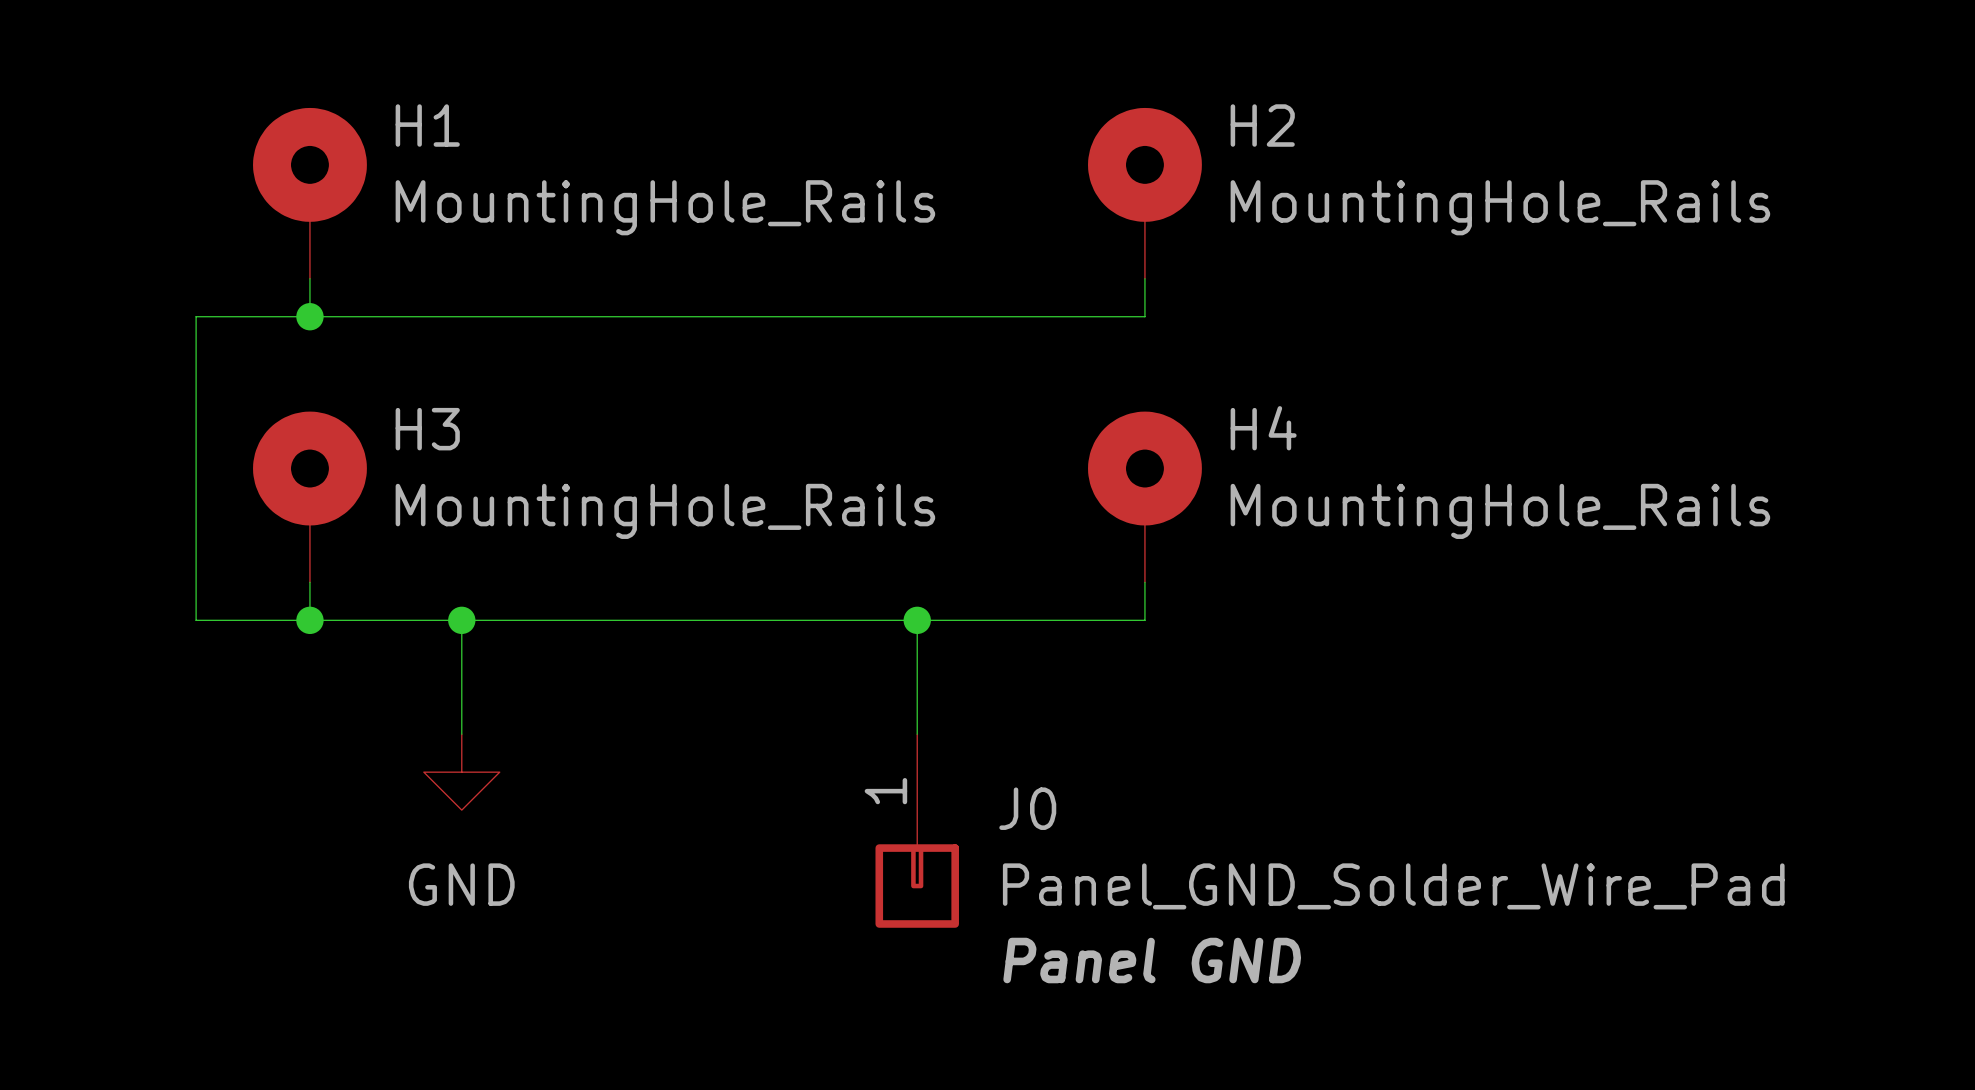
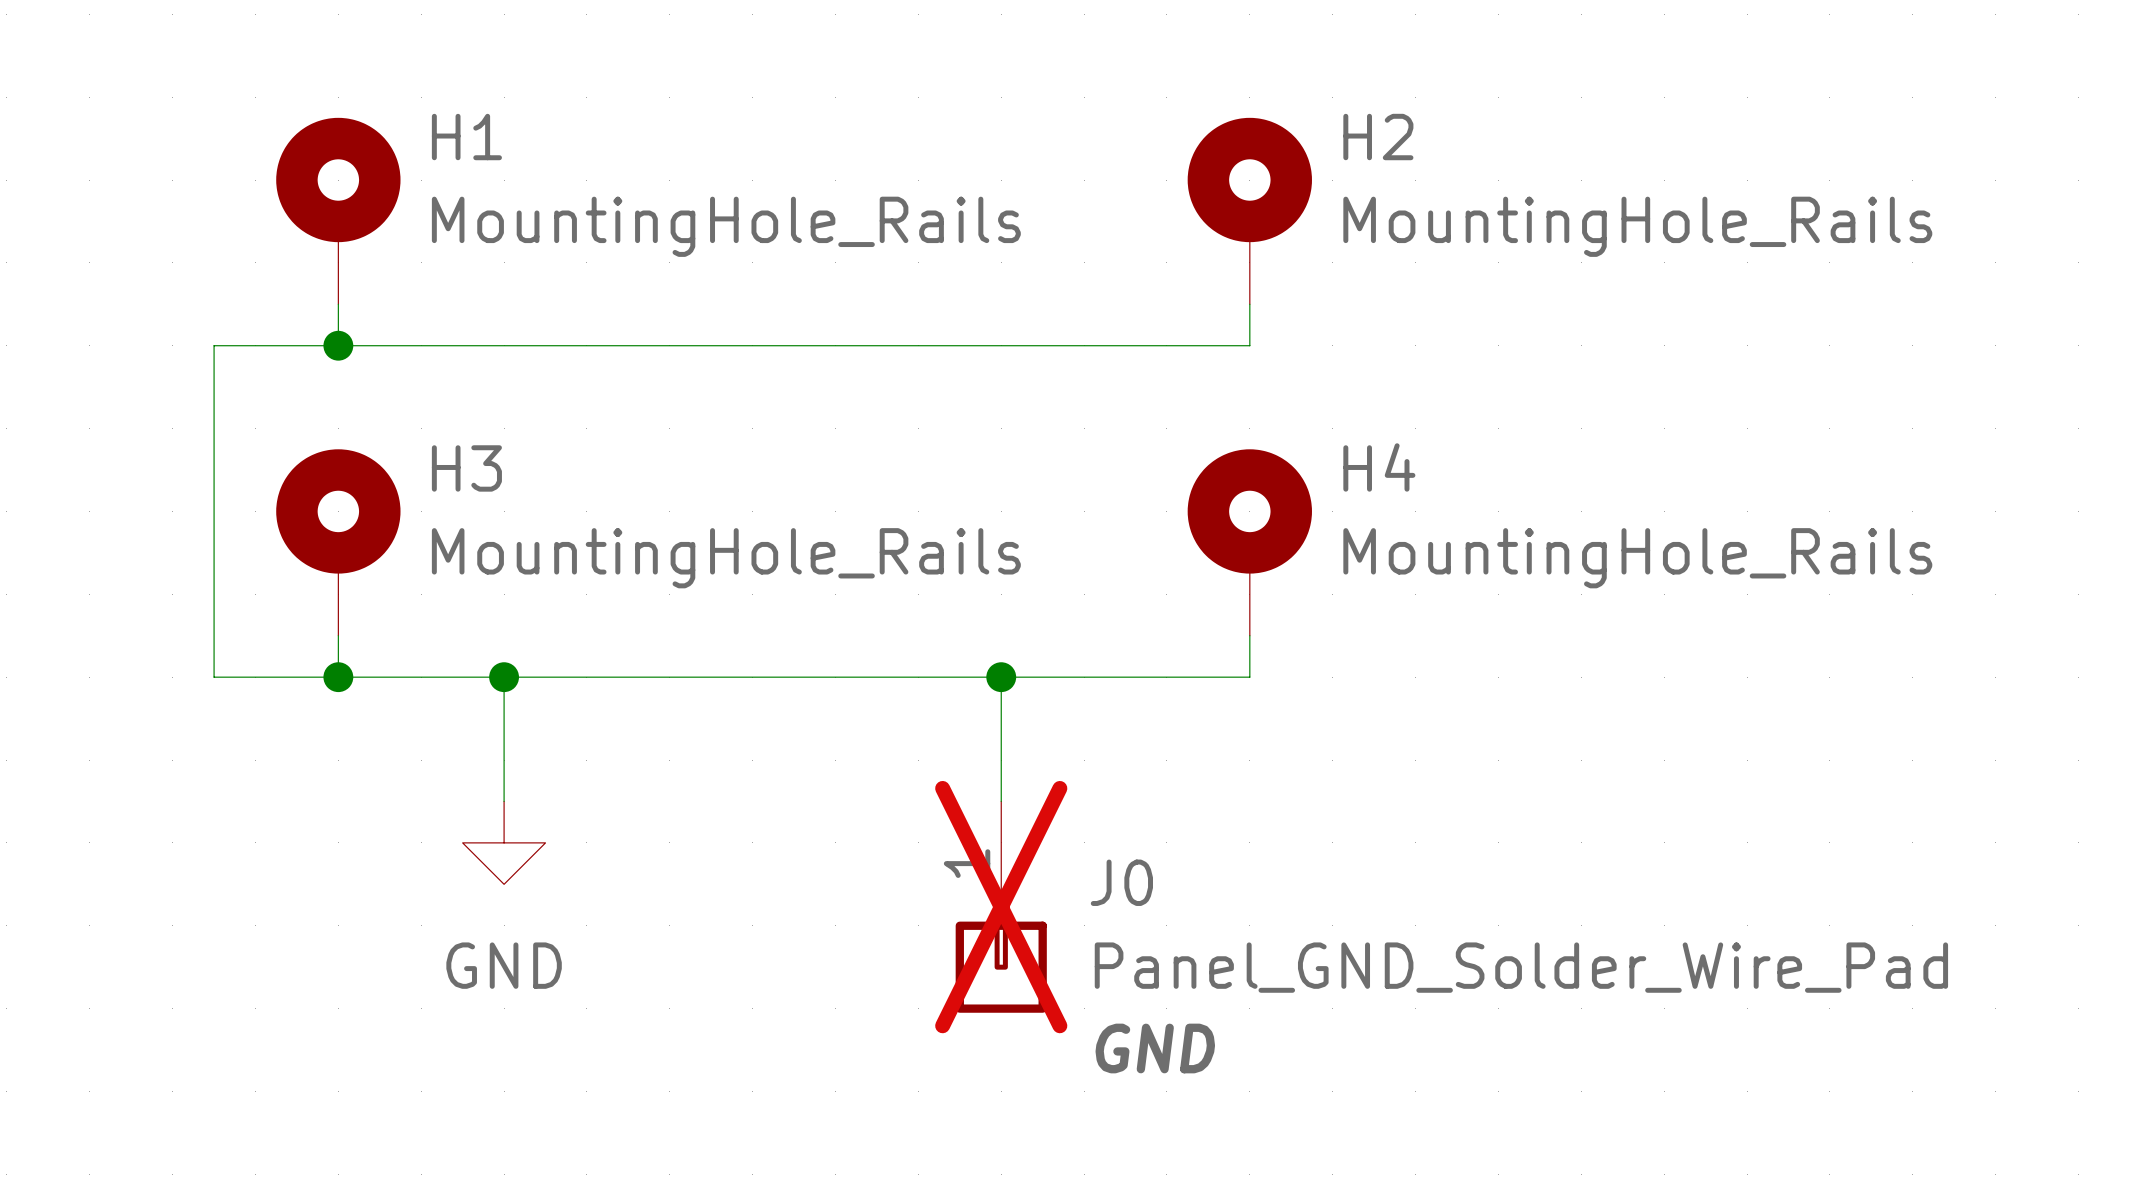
J0 do-not-place cross: none -> (1001, 907)
J0 text: Panel GND (1152, 960) -> GND (1155, 1048)

